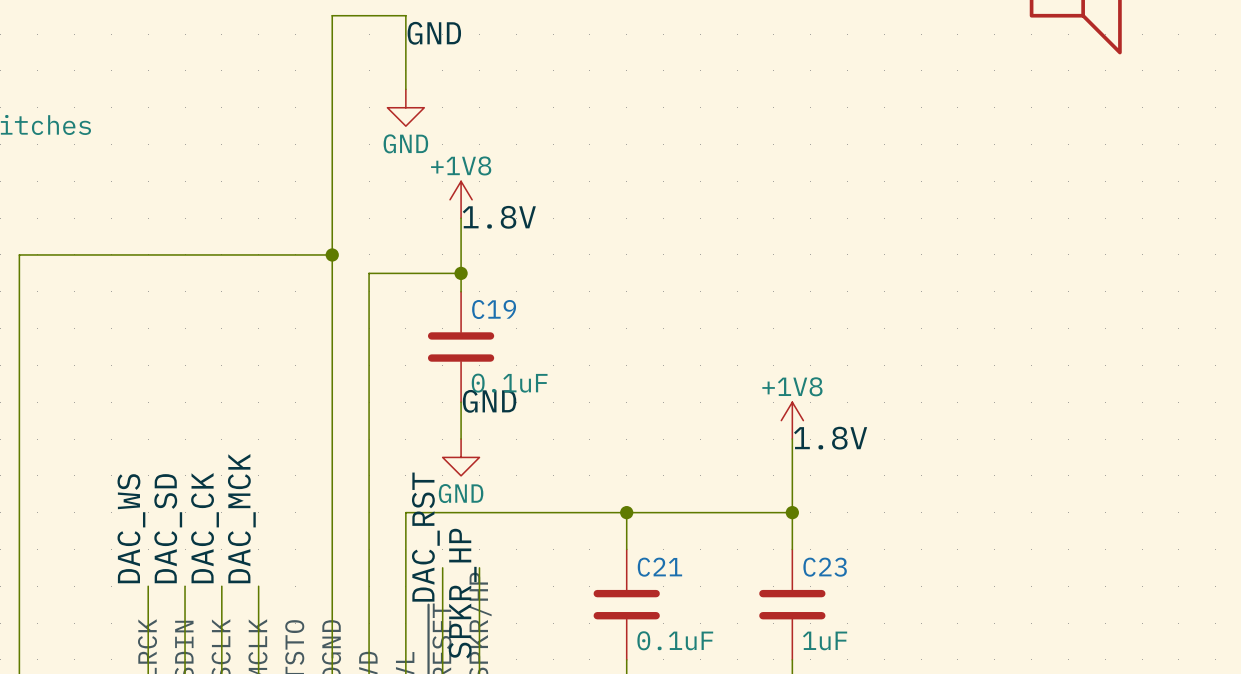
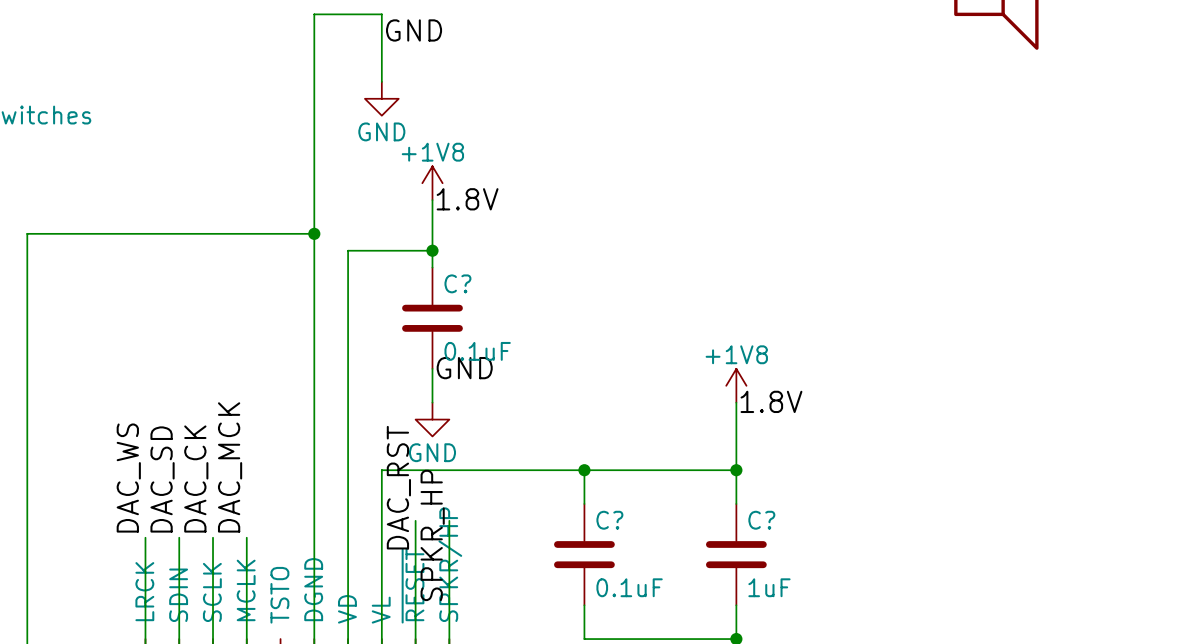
C19 name: C19 (494, 309) -> C? (457, 283)
C21 name: C21 (659, 567) -> C? (609, 520)
C23 name: C23 (825, 567) -> C? (761, 520)

